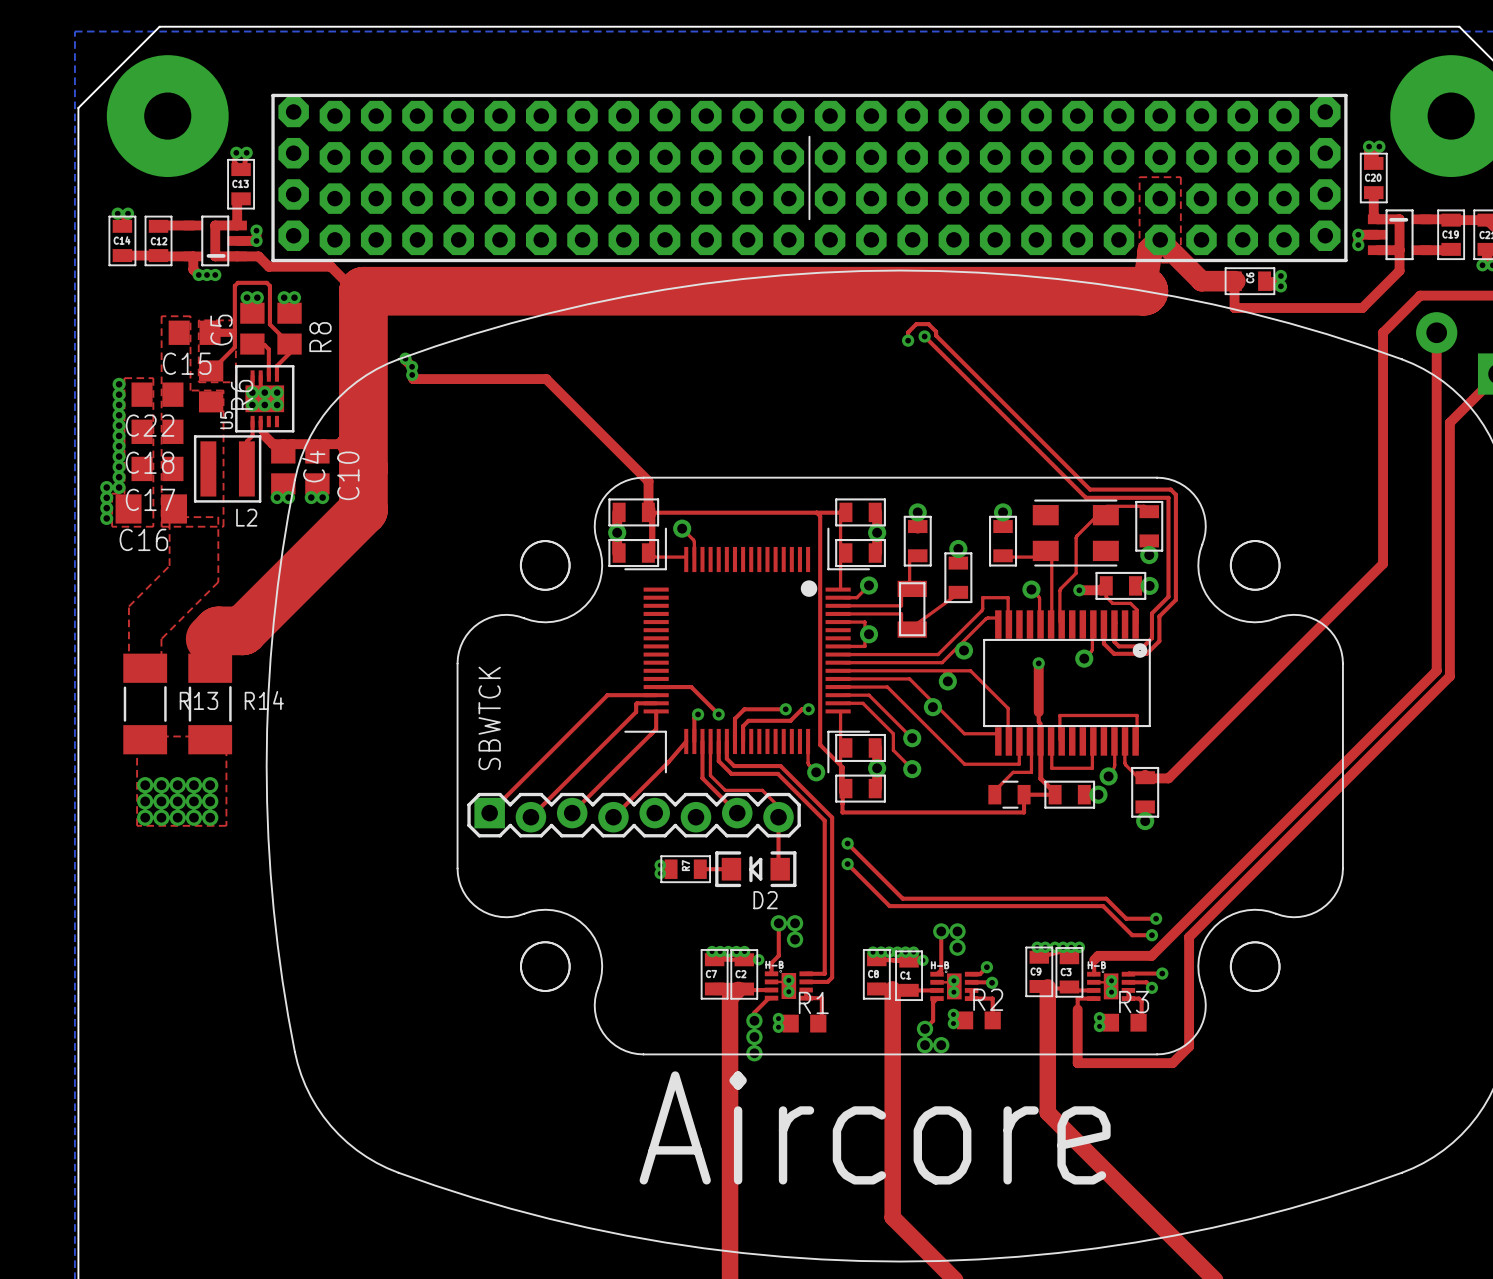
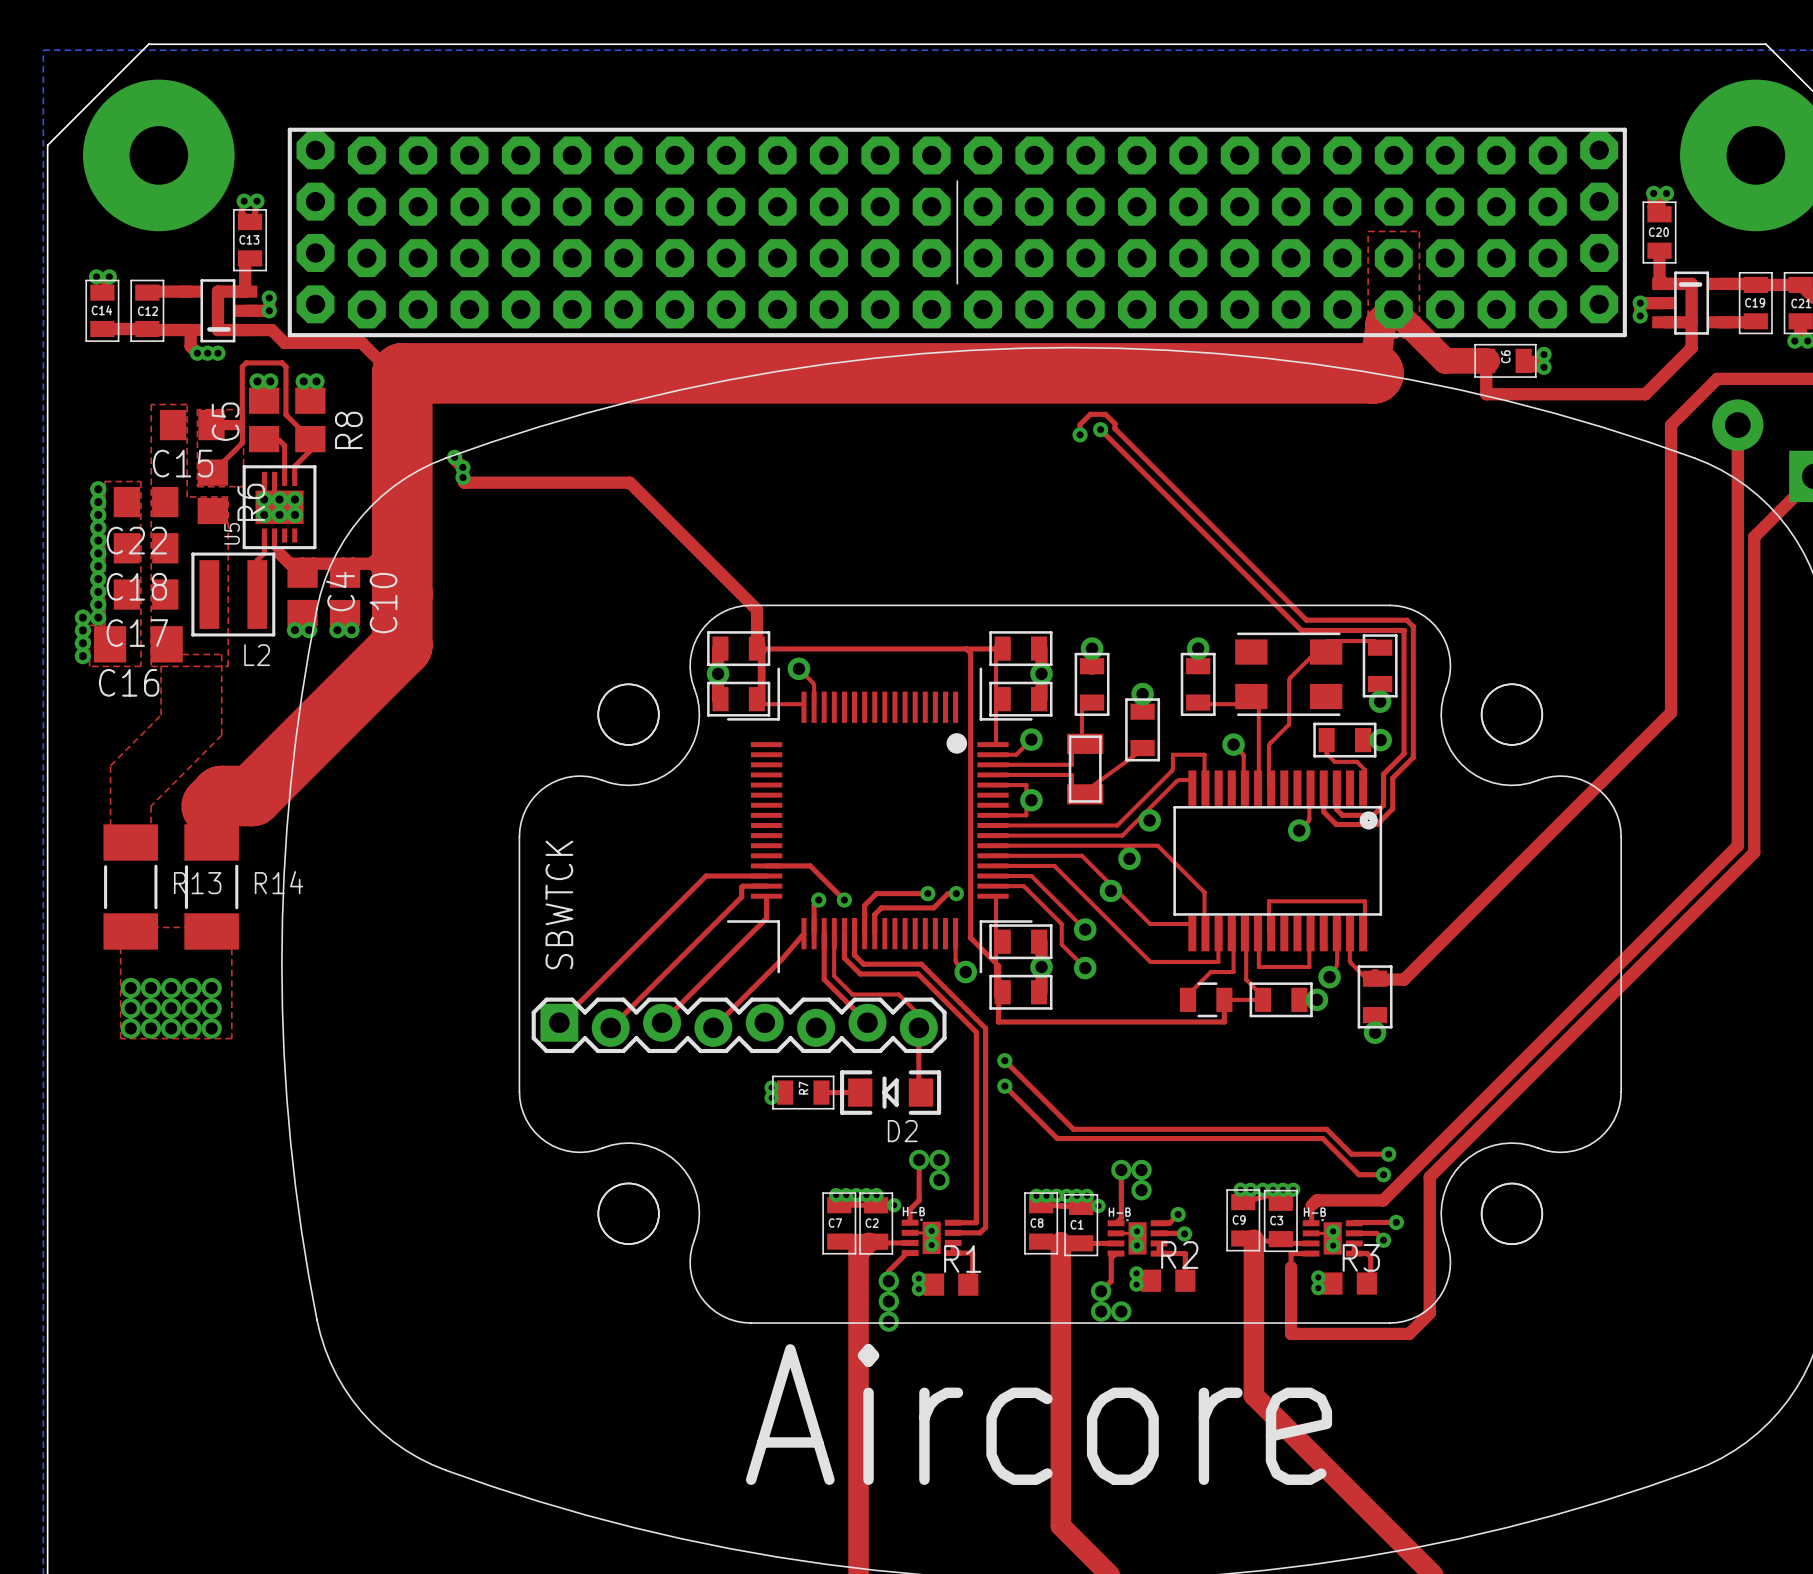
top track: (1104, 585) (1100, 590) (1079, 590) -> none
via: (1079, 590) -> none
top track: (1038, 663) (1040, 778) (1053, 792) (1053, 794) (1025, 794) (1023, 796) -> none
via: (1038, 663) -> none

